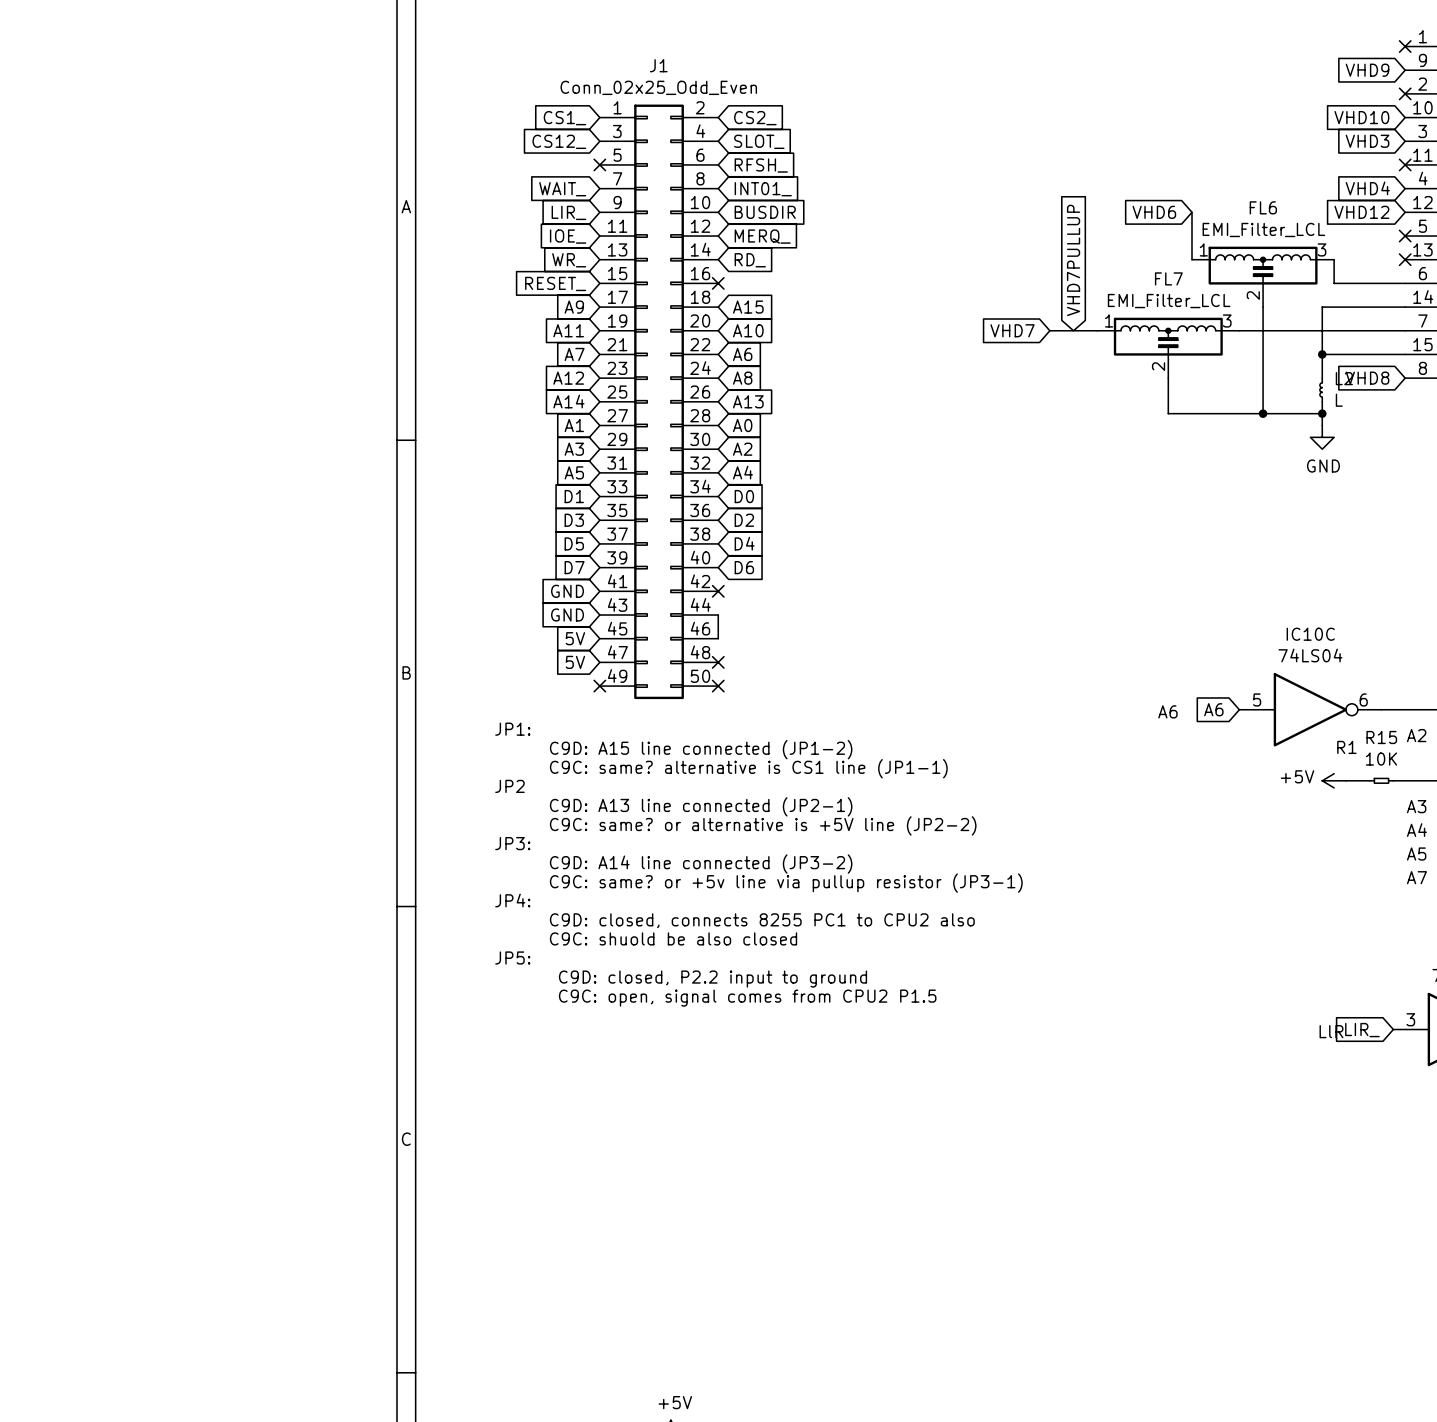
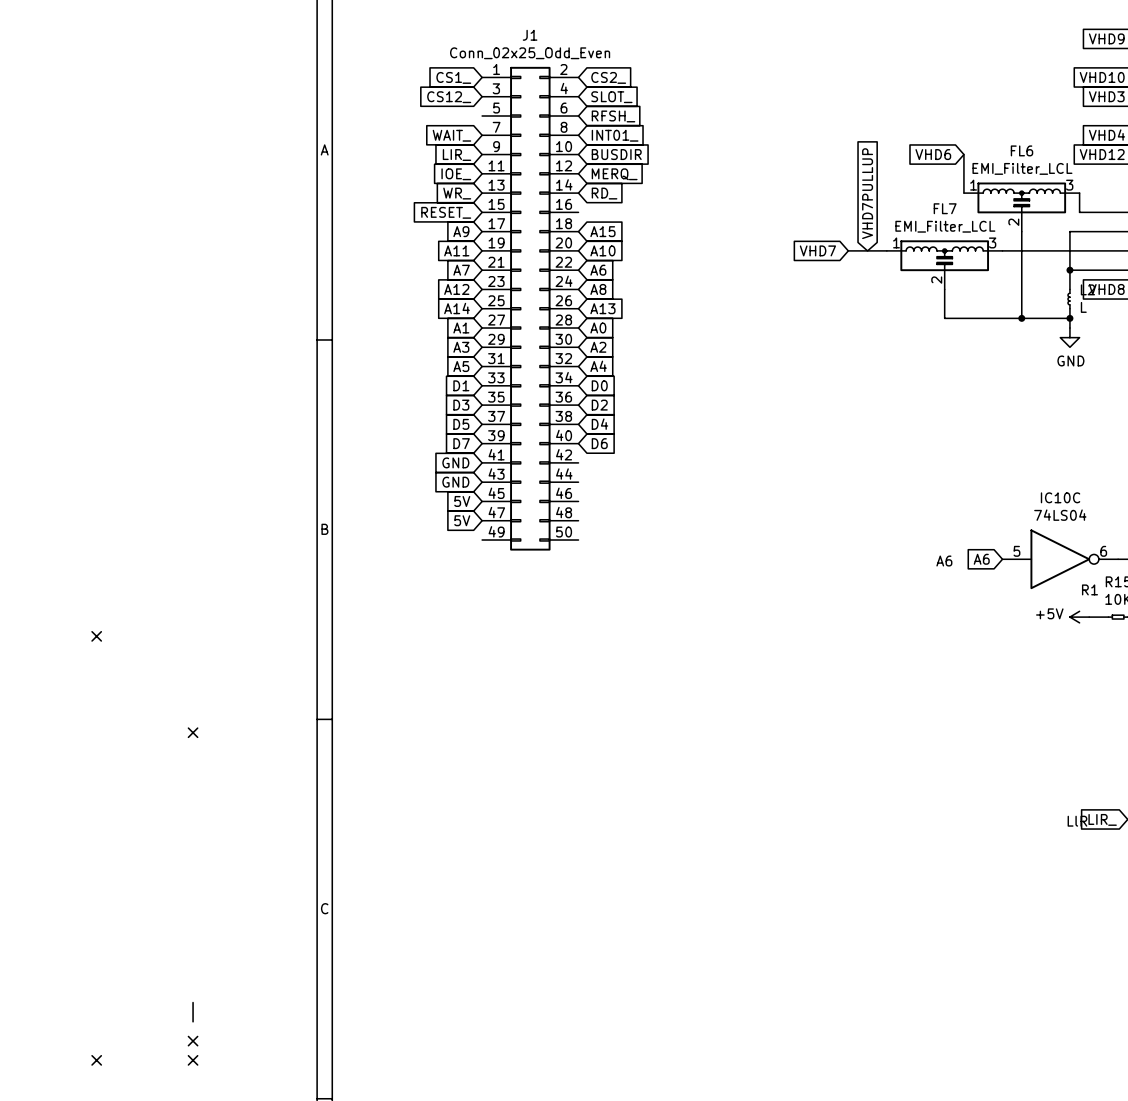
no-connect mark: (599, 164) -> none
no-connect mark: (718, 283) -> none
no-connect mark: (718, 591) -> none
wire: (718, 615) (718, 638) -> none
no-connect mark: (718, 662) -> none
no-connect mark: (599, 686) -> none
no-connect mark: (718, 686) -> none
text: JP1: (512, 729) -> none
text: C9D: A15 line connected (JP1-2) (701, 749) -> none
text: C9C: same? alternative is CS1 line (JP1-1) (748, 768) -> none
text: JP2 (509, 786) -> none
no-connect mark: none -> (96, 636)
text: C9D: A13 line connected (JP2-1) (701, 806) -> none
text: C9C: same? or alternative is +5V line (JP2-2) (763, 825) -> none
text: JP3: (512, 843) -> none
text: C9D: A14 line connected (JP3-2) (701, 864) -> none
text: C9C: same? or +5v line via pullup resistor (JP3-1) (786, 883) -> none
text: JP4: (512, 900) -> none
text: C9D: closed, connects 8255 PC1 to CPU2 also (762, 920) -> none
no-connect mark: none -> (193, 732)
text: C9C: shuold be also closed (673, 938) -> none
text: JP5: (512, 957) -> none
text: C9D: closed, P2.2 input to ground (712, 979) -> none
text: C9C: open, signal comes from CPU2 P1.5 (747, 998) -> none
wire: none -> (193, 1002) (193, 1021)
no-connect mark: none -> (193, 1041)
no-connect mark: none -> (96, 1060)
no-connect mark: none -> (193, 1060)

